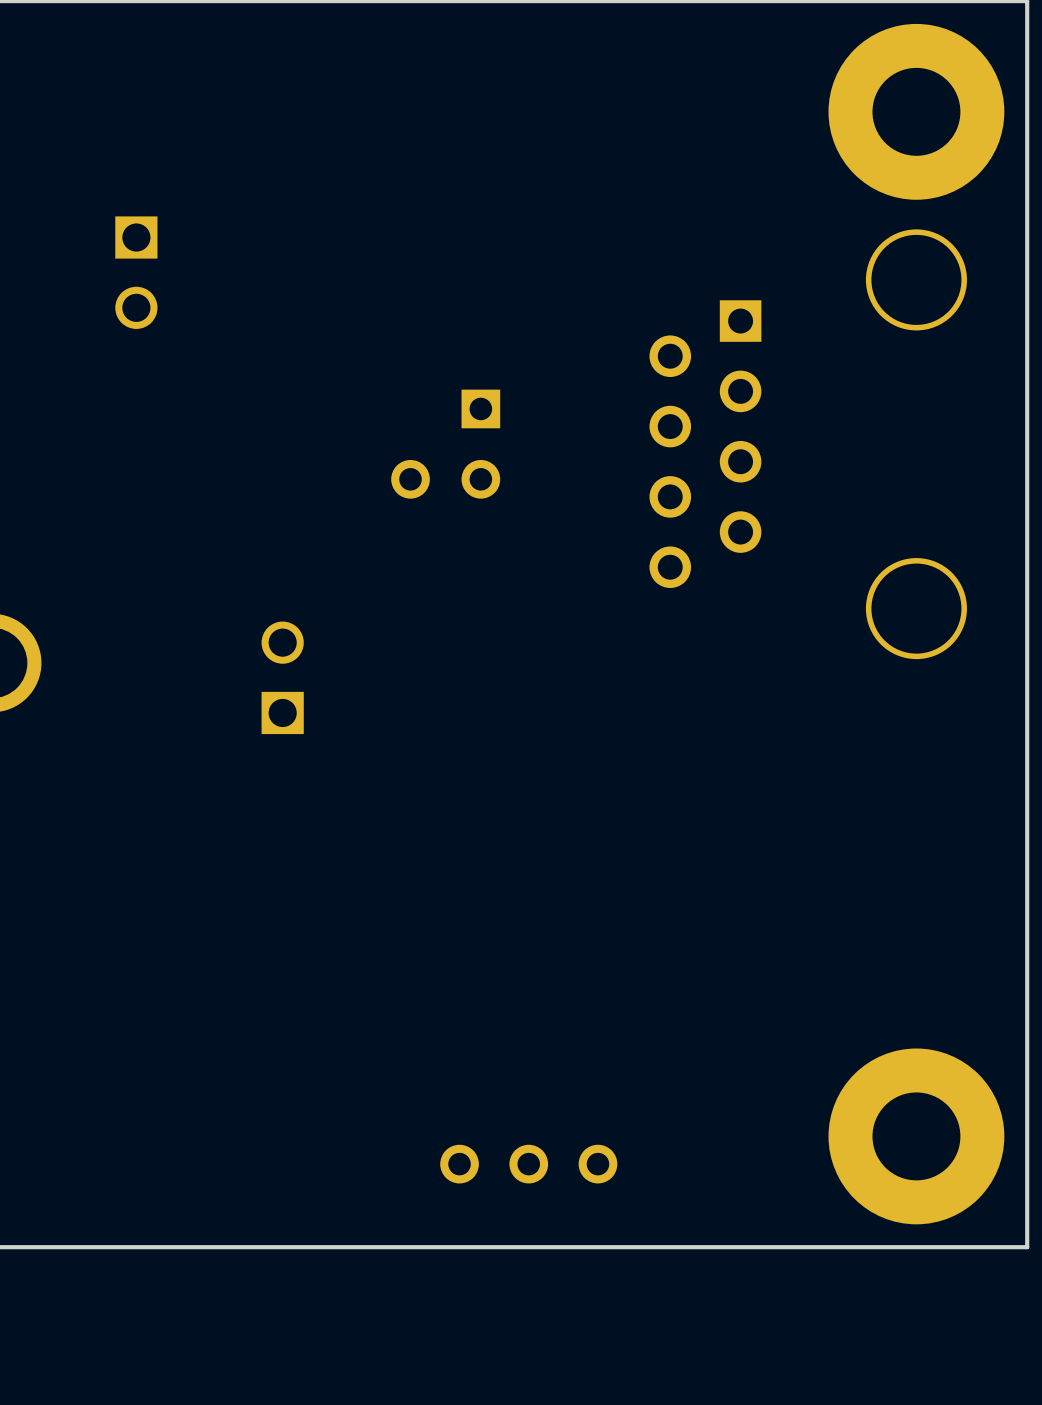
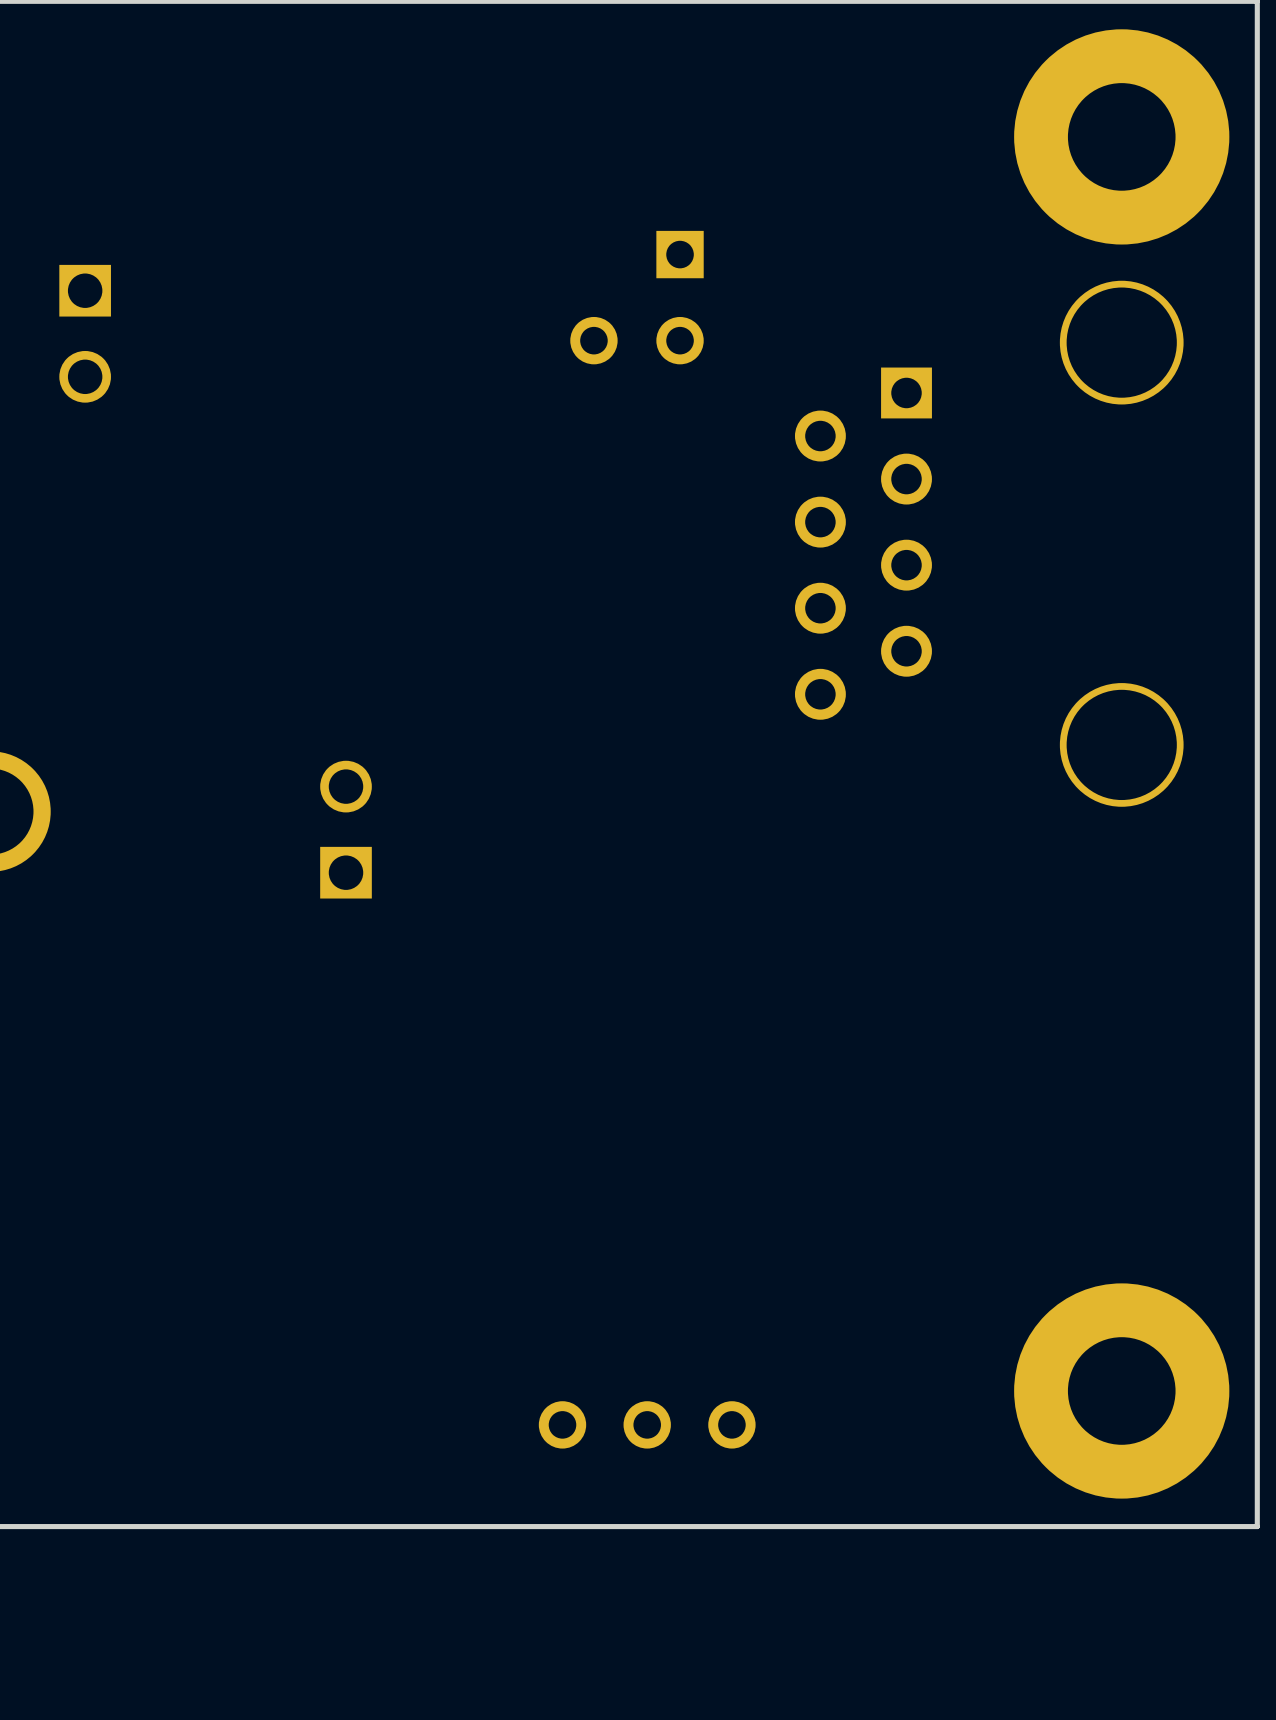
part position: (136, 272) -> (85, 333)
part position: (445, 444) -> (636, 297)

